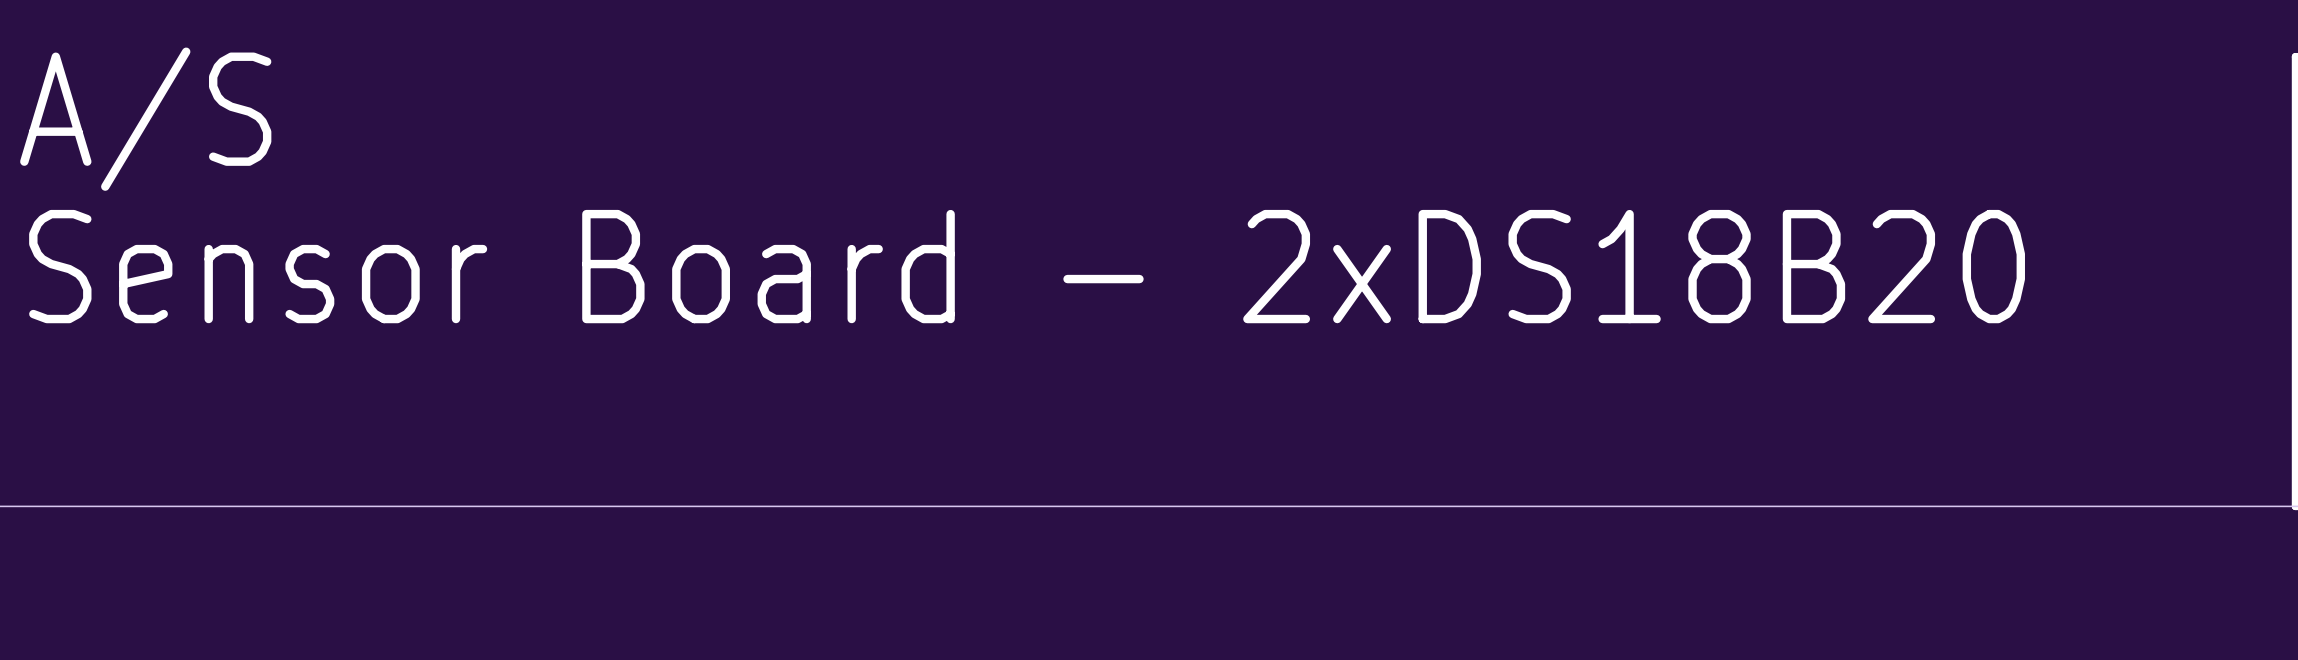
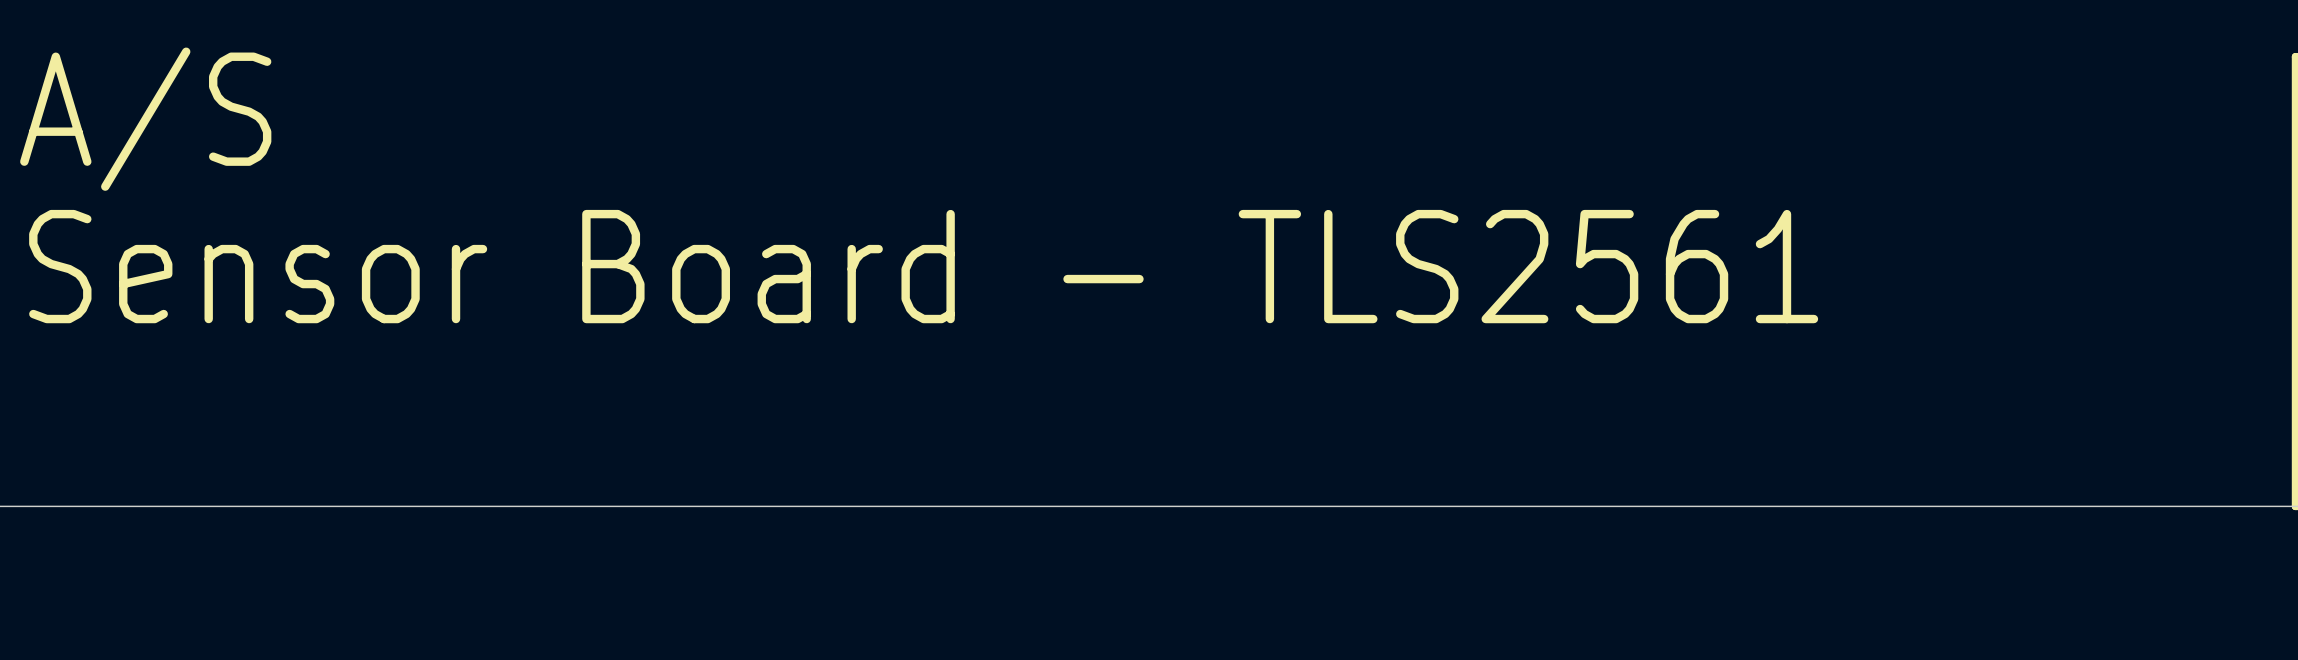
text: Sensor Board - 2xDS18B20 (1027, 266) -> Sensor Board - TLS2561 (923, 266)

